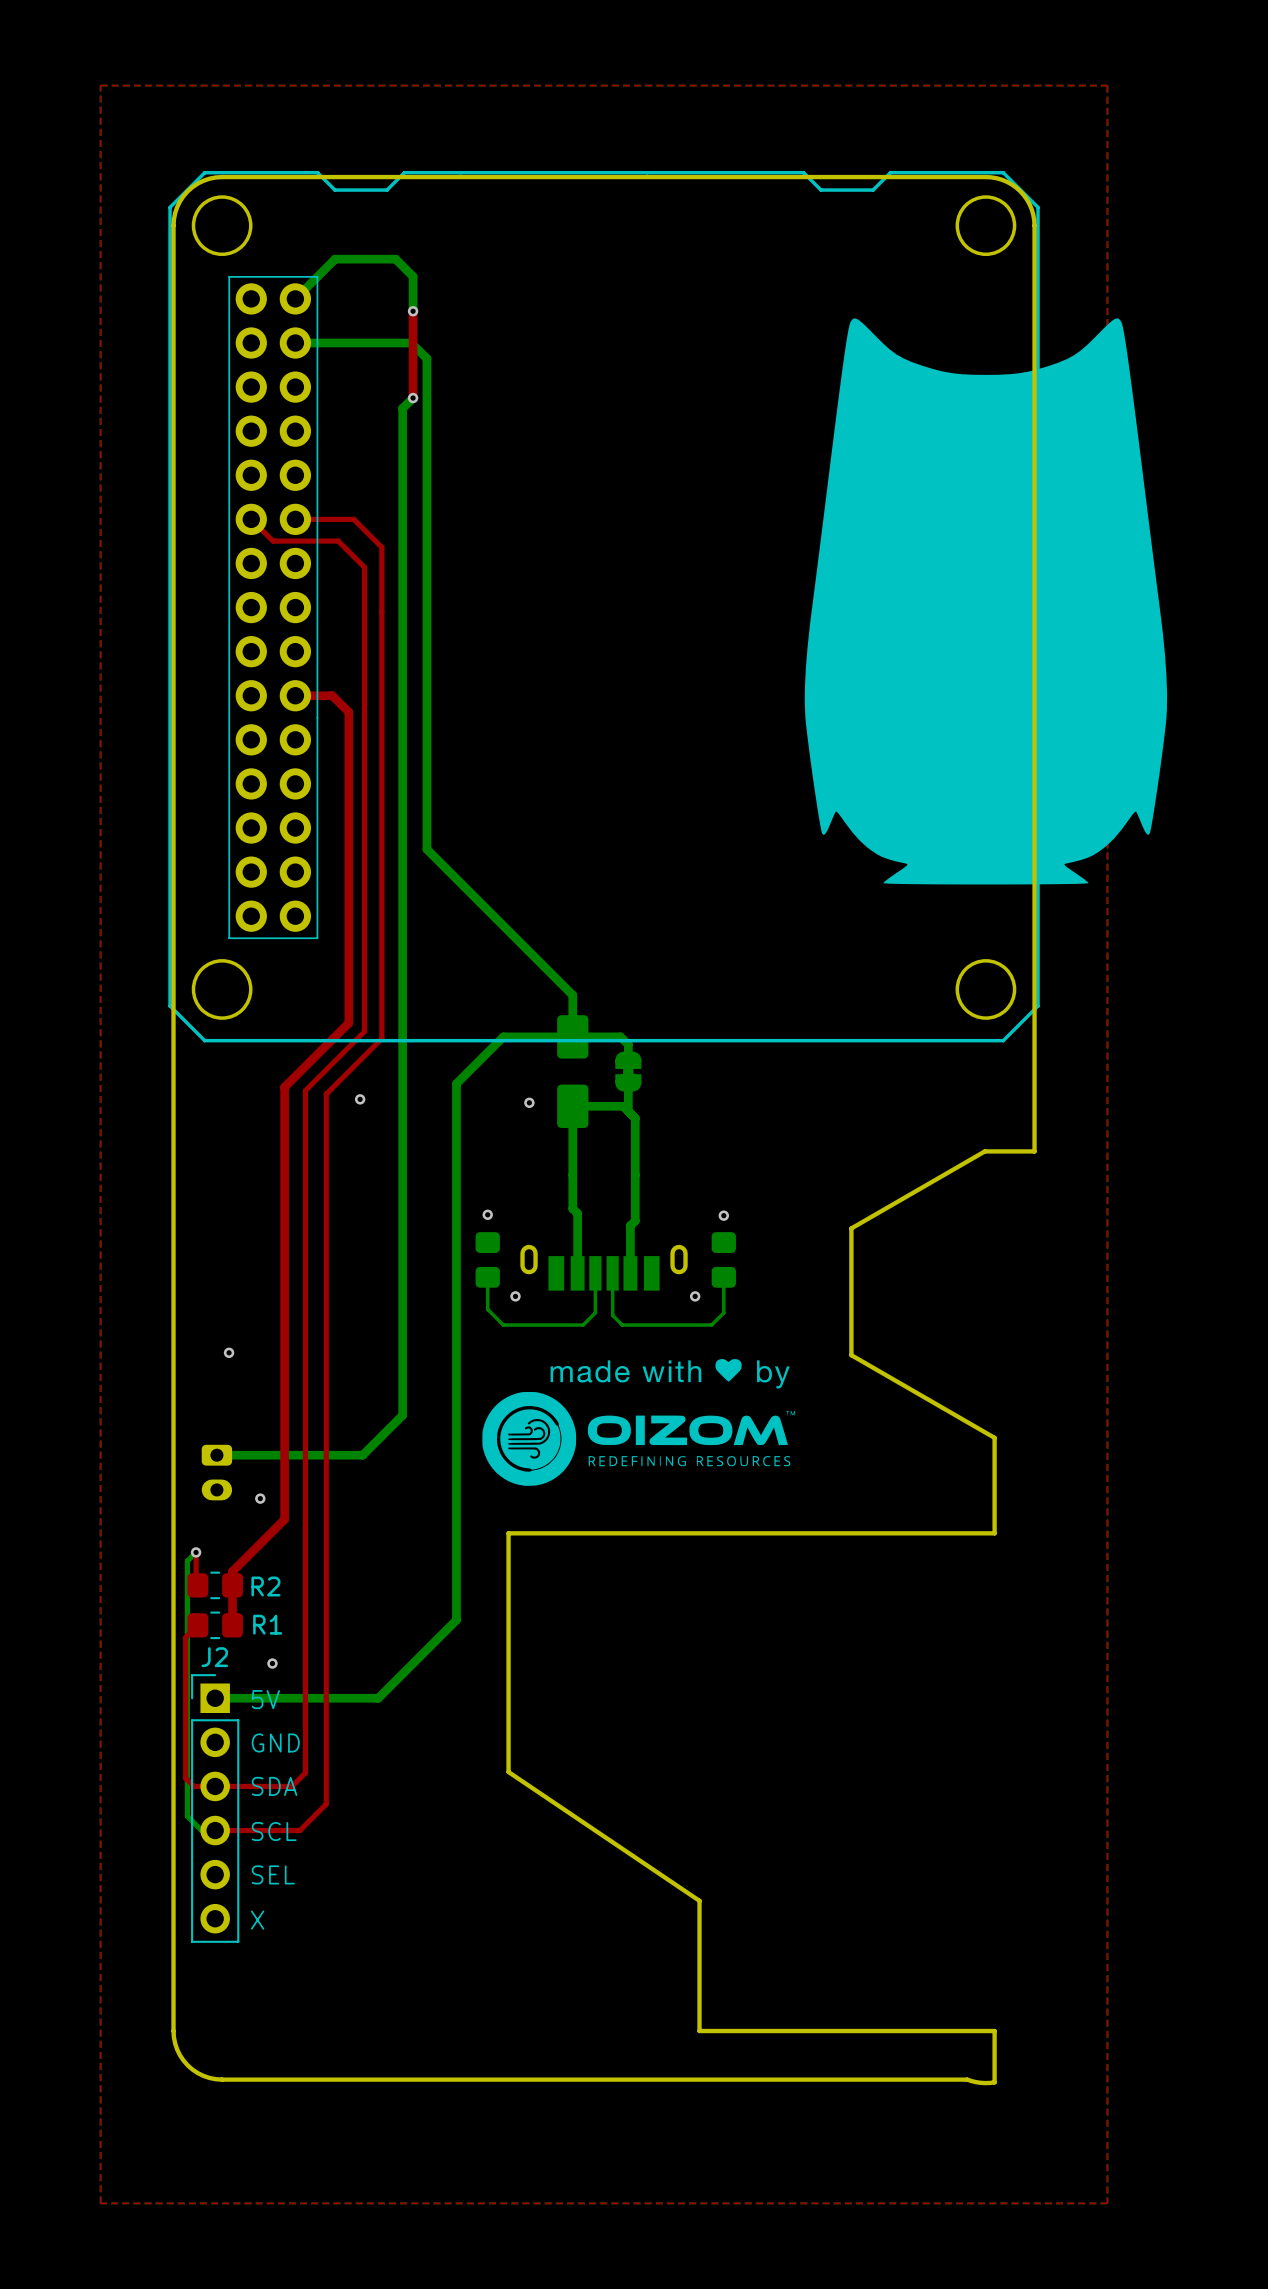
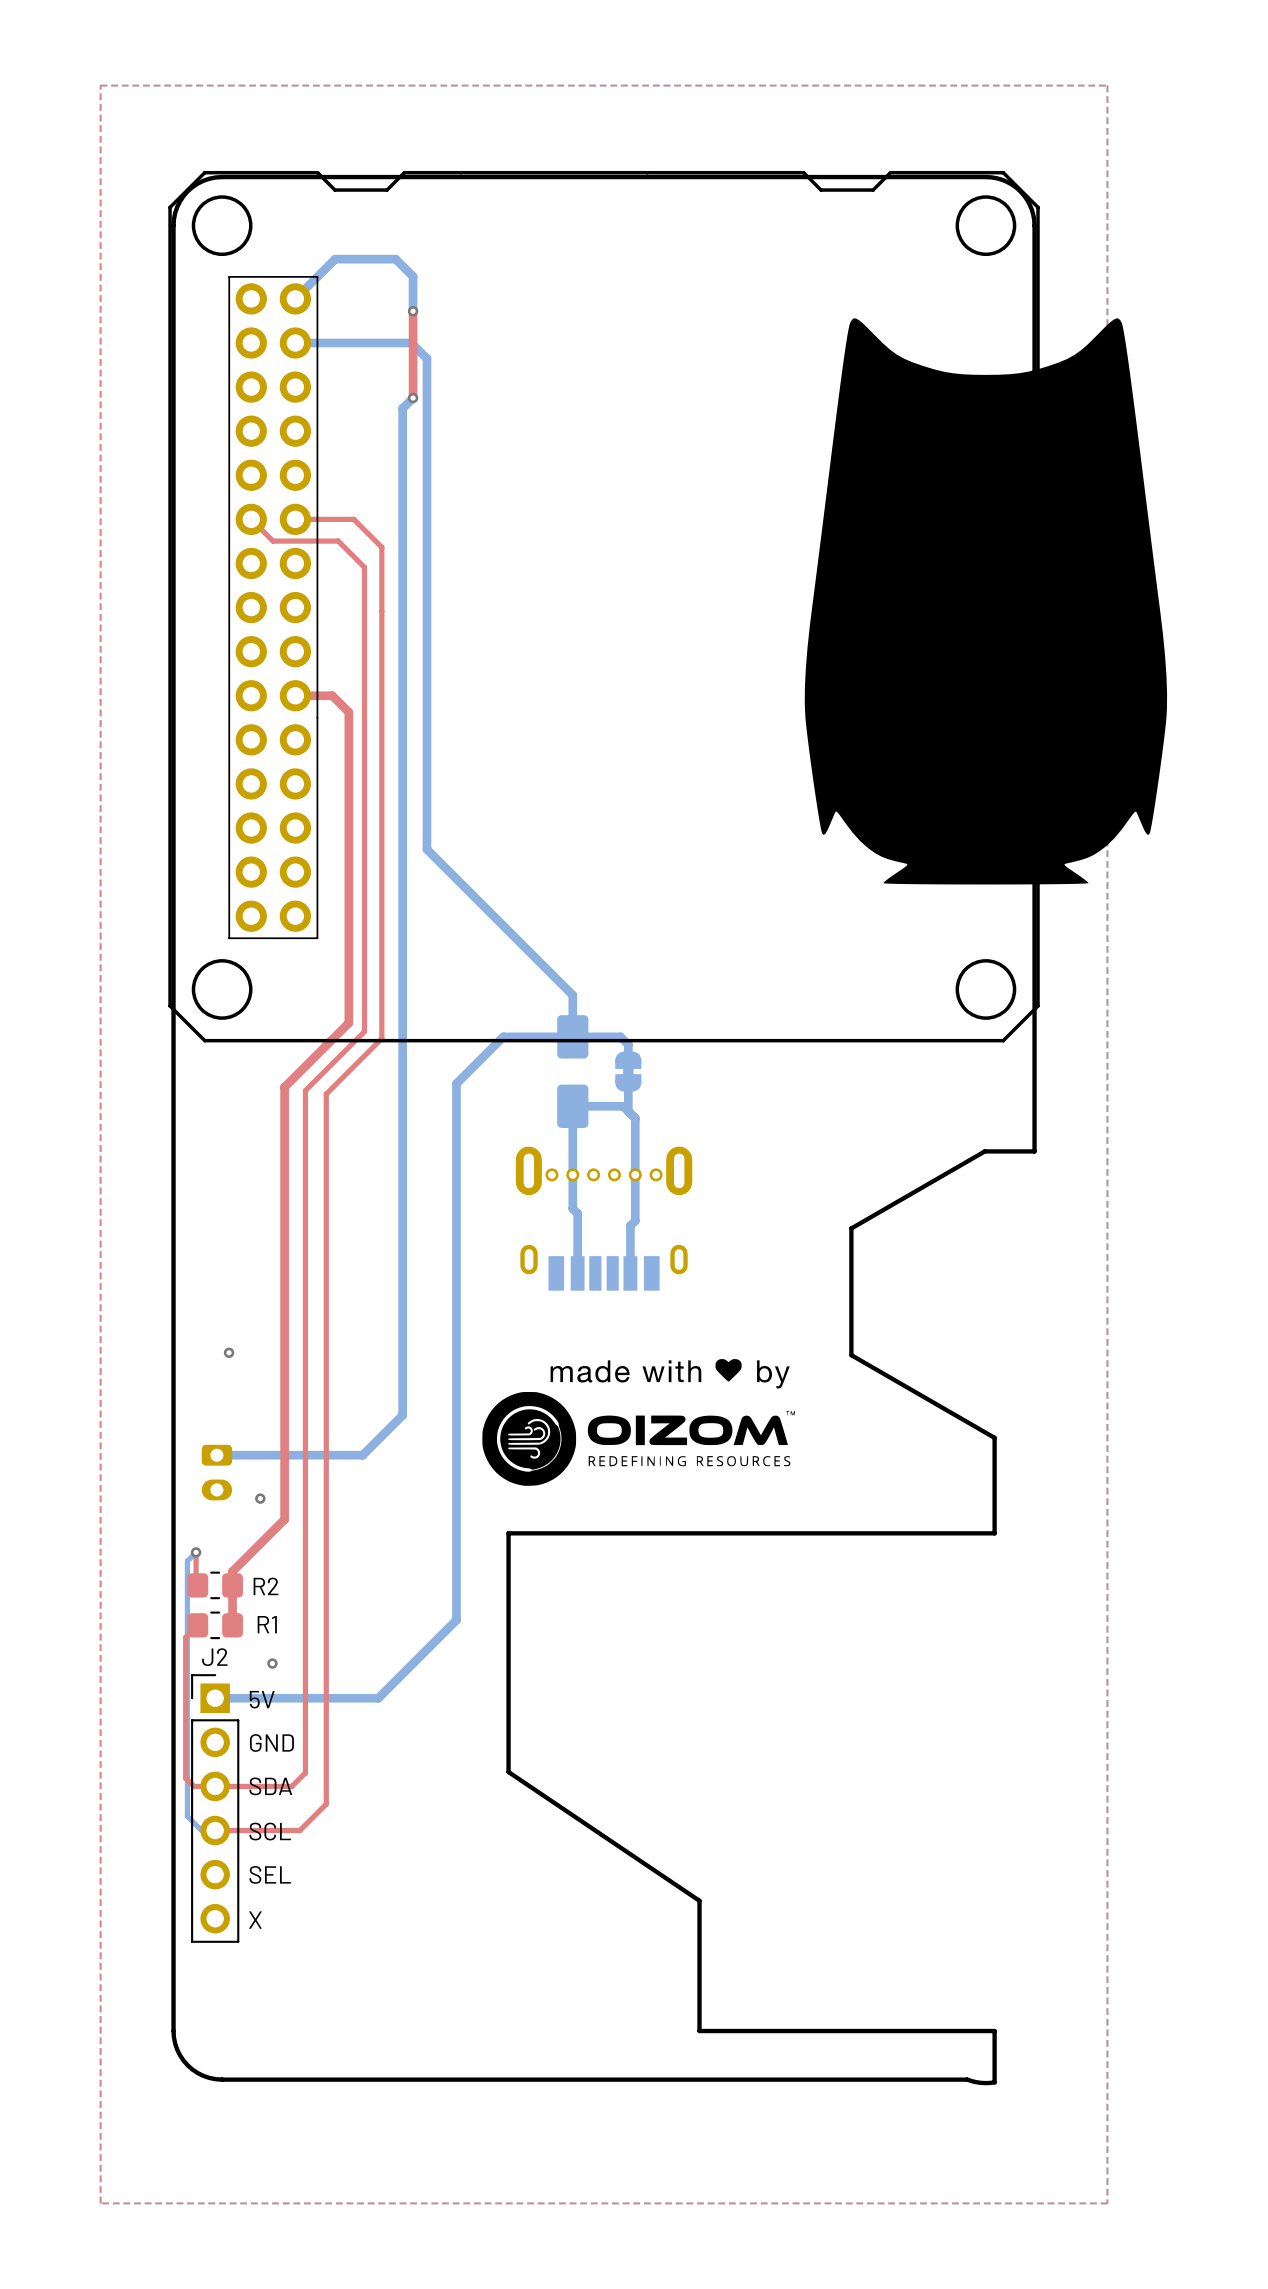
via: (360, 1099) -> none
via: (529, 1102) -> none
part: none -> (604, 1170)
via: (487, 1214) -> none
via: (723, 1215) -> none
part: (487, 1259) -> none
part: (723, 1259) -> none
bottom track: (595, 1273) (595, 1312) (583, 1325) (503, 1325) (487, 1309) (487, 1277) -> none
bottom track: (612, 1273) (612, 1315) (622, 1325) (711, 1325) (723, 1312) (723, 1277) -> none
via: (515, 1296) -> none
via: (695, 1296) -> none

